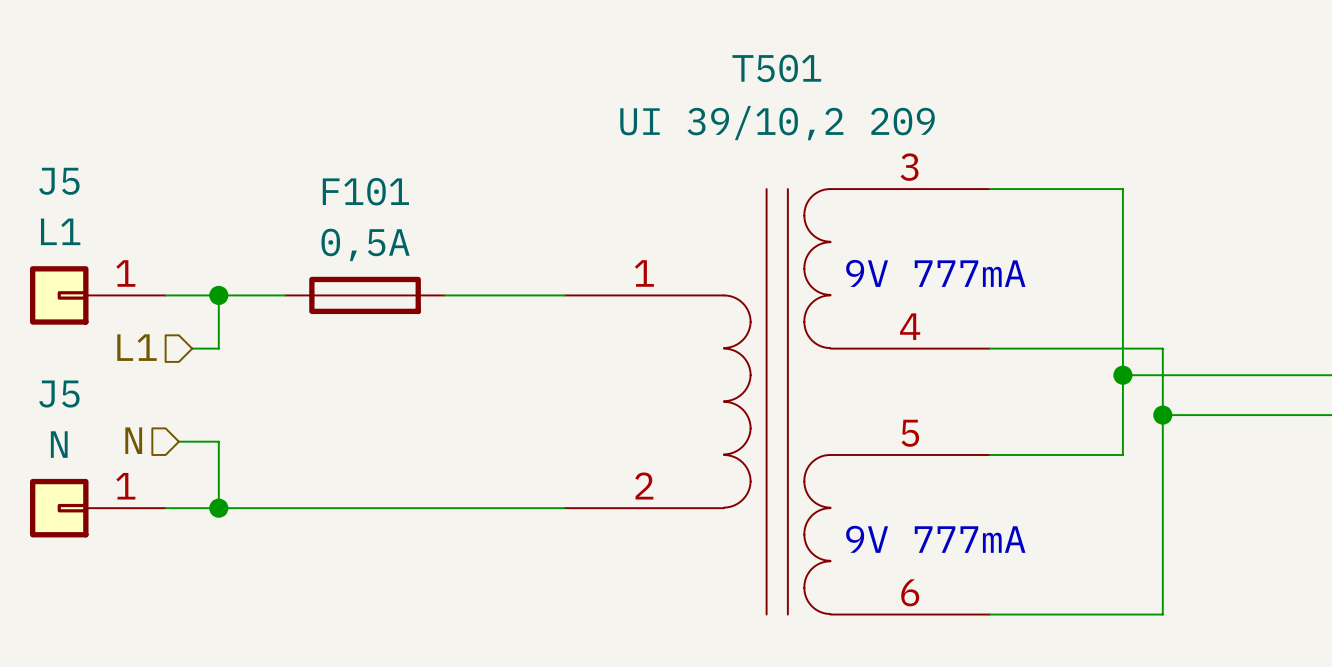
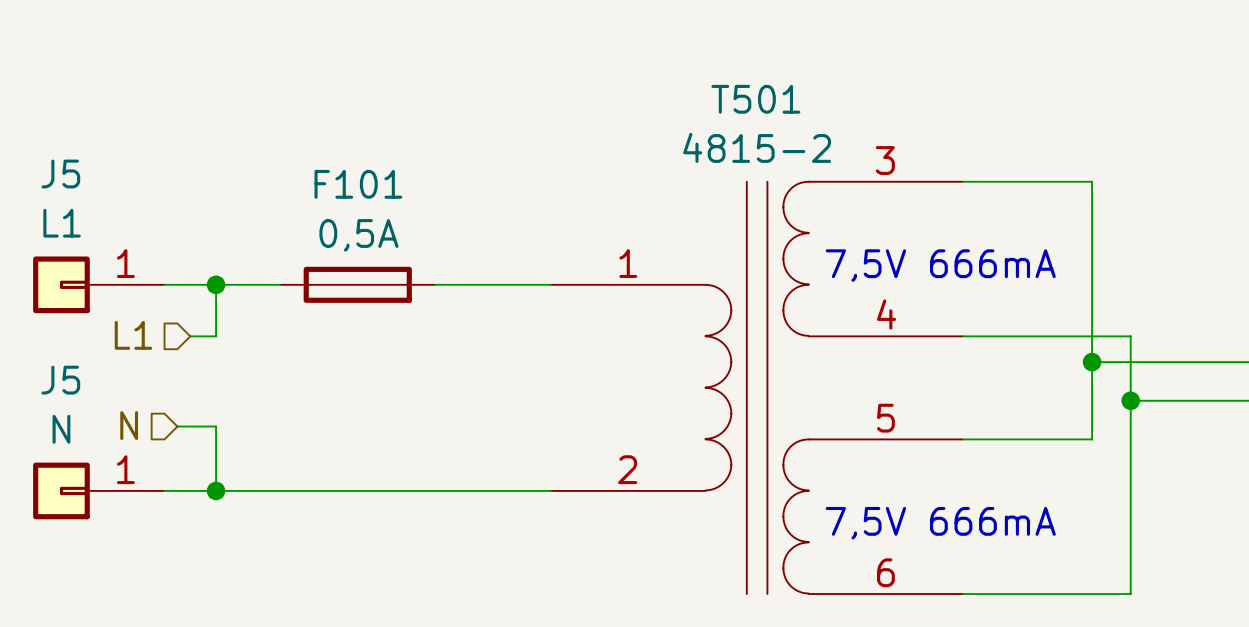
T501 name position: T501 (776, 68) -> T501 (755, 99)
T501 value: UI 39/10,2 209 (777, 123) -> 4815-2 (757, 147)
text: 9V 777mA (935, 273) -> 7,5V 666mA (940, 265)
text: 9V 777mA (935, 539) -> 7,5V 666mA (940, 523)

